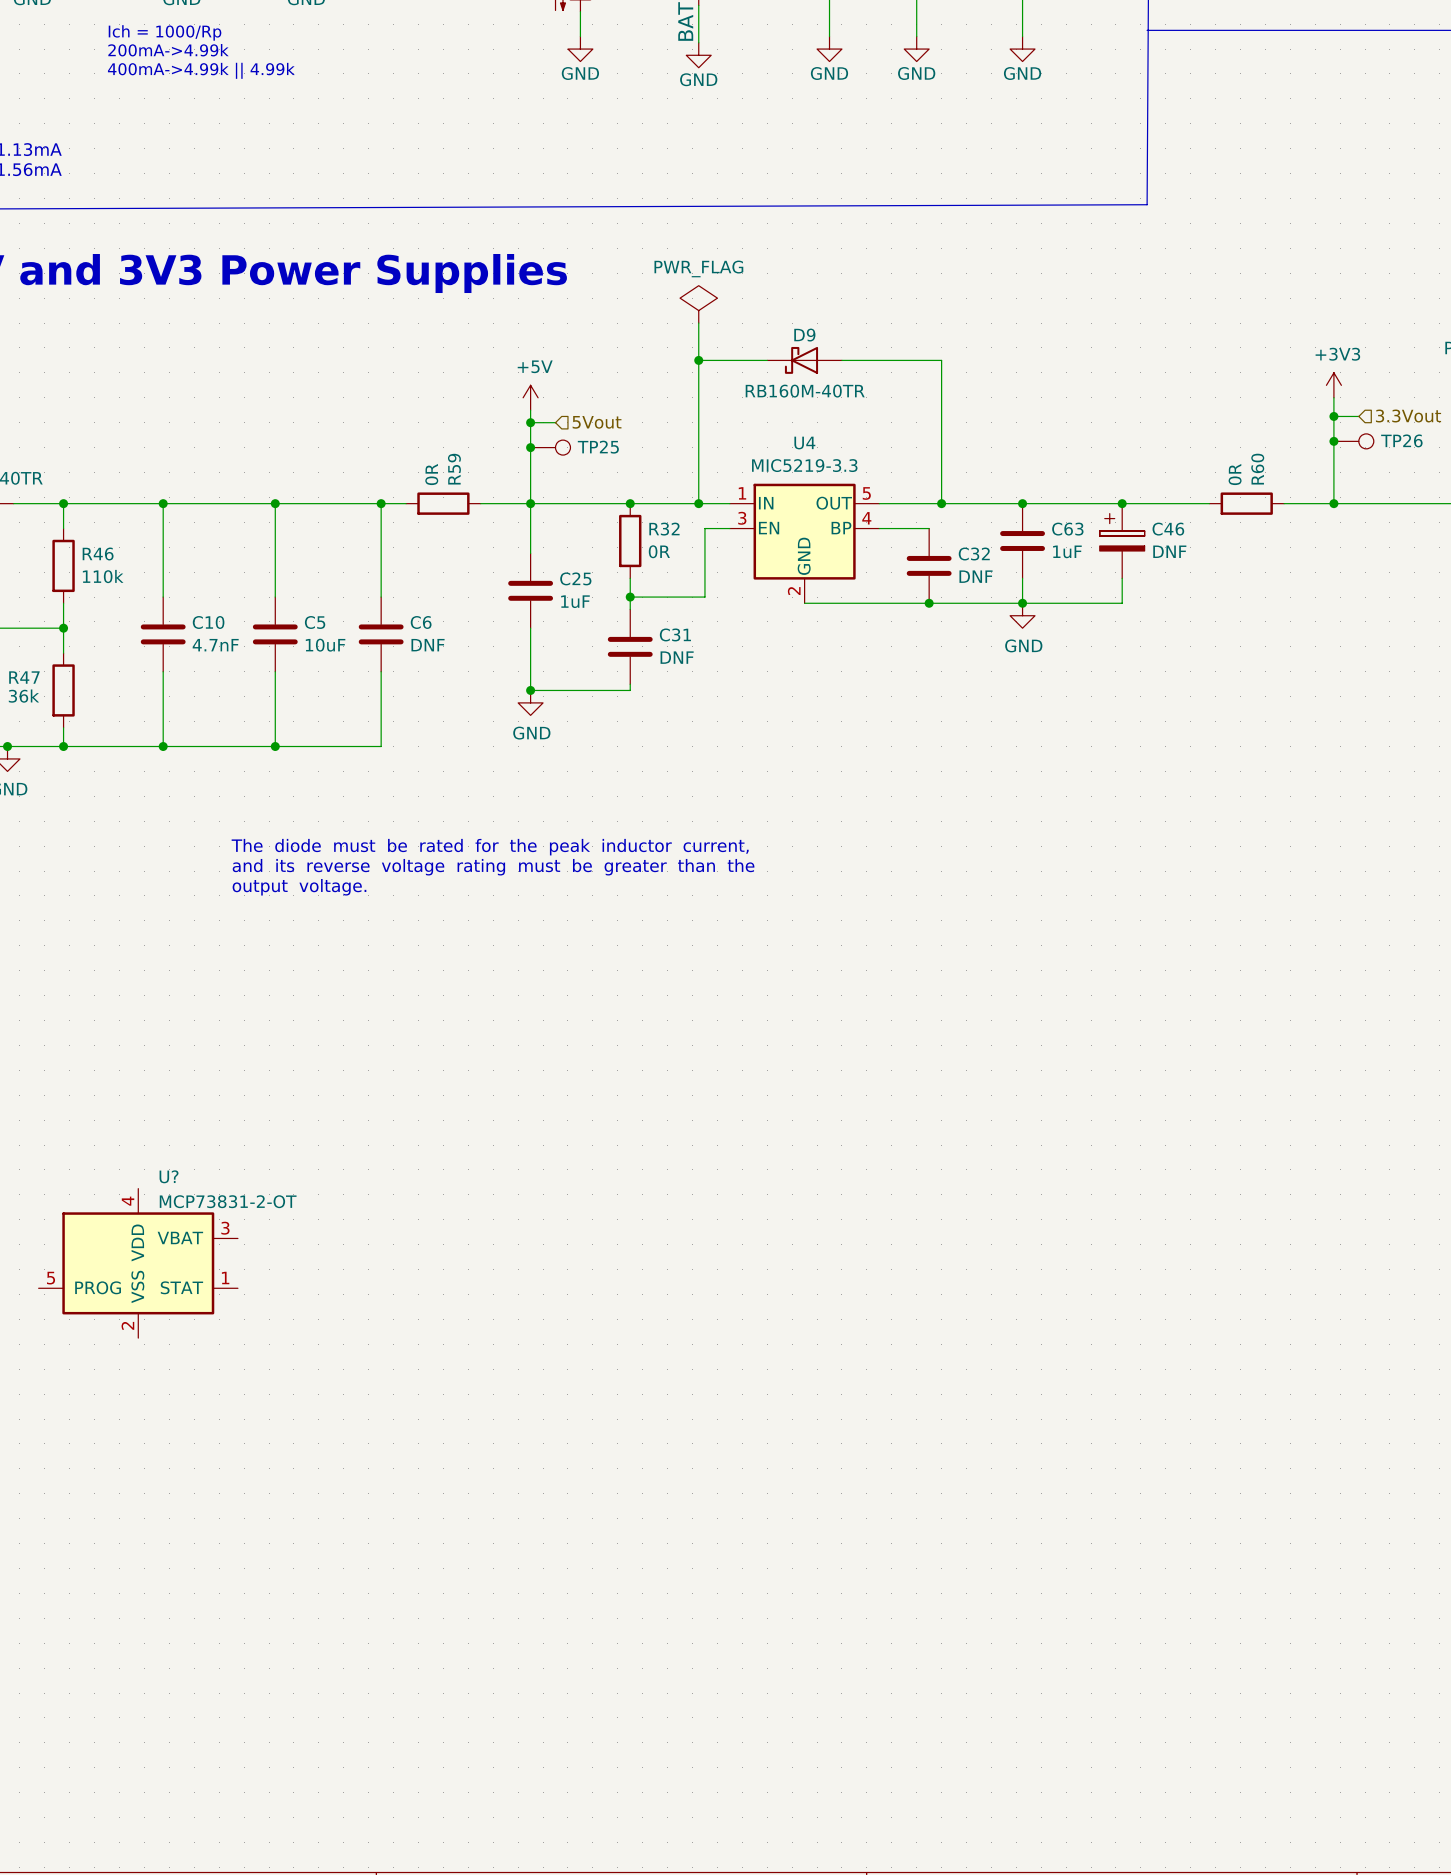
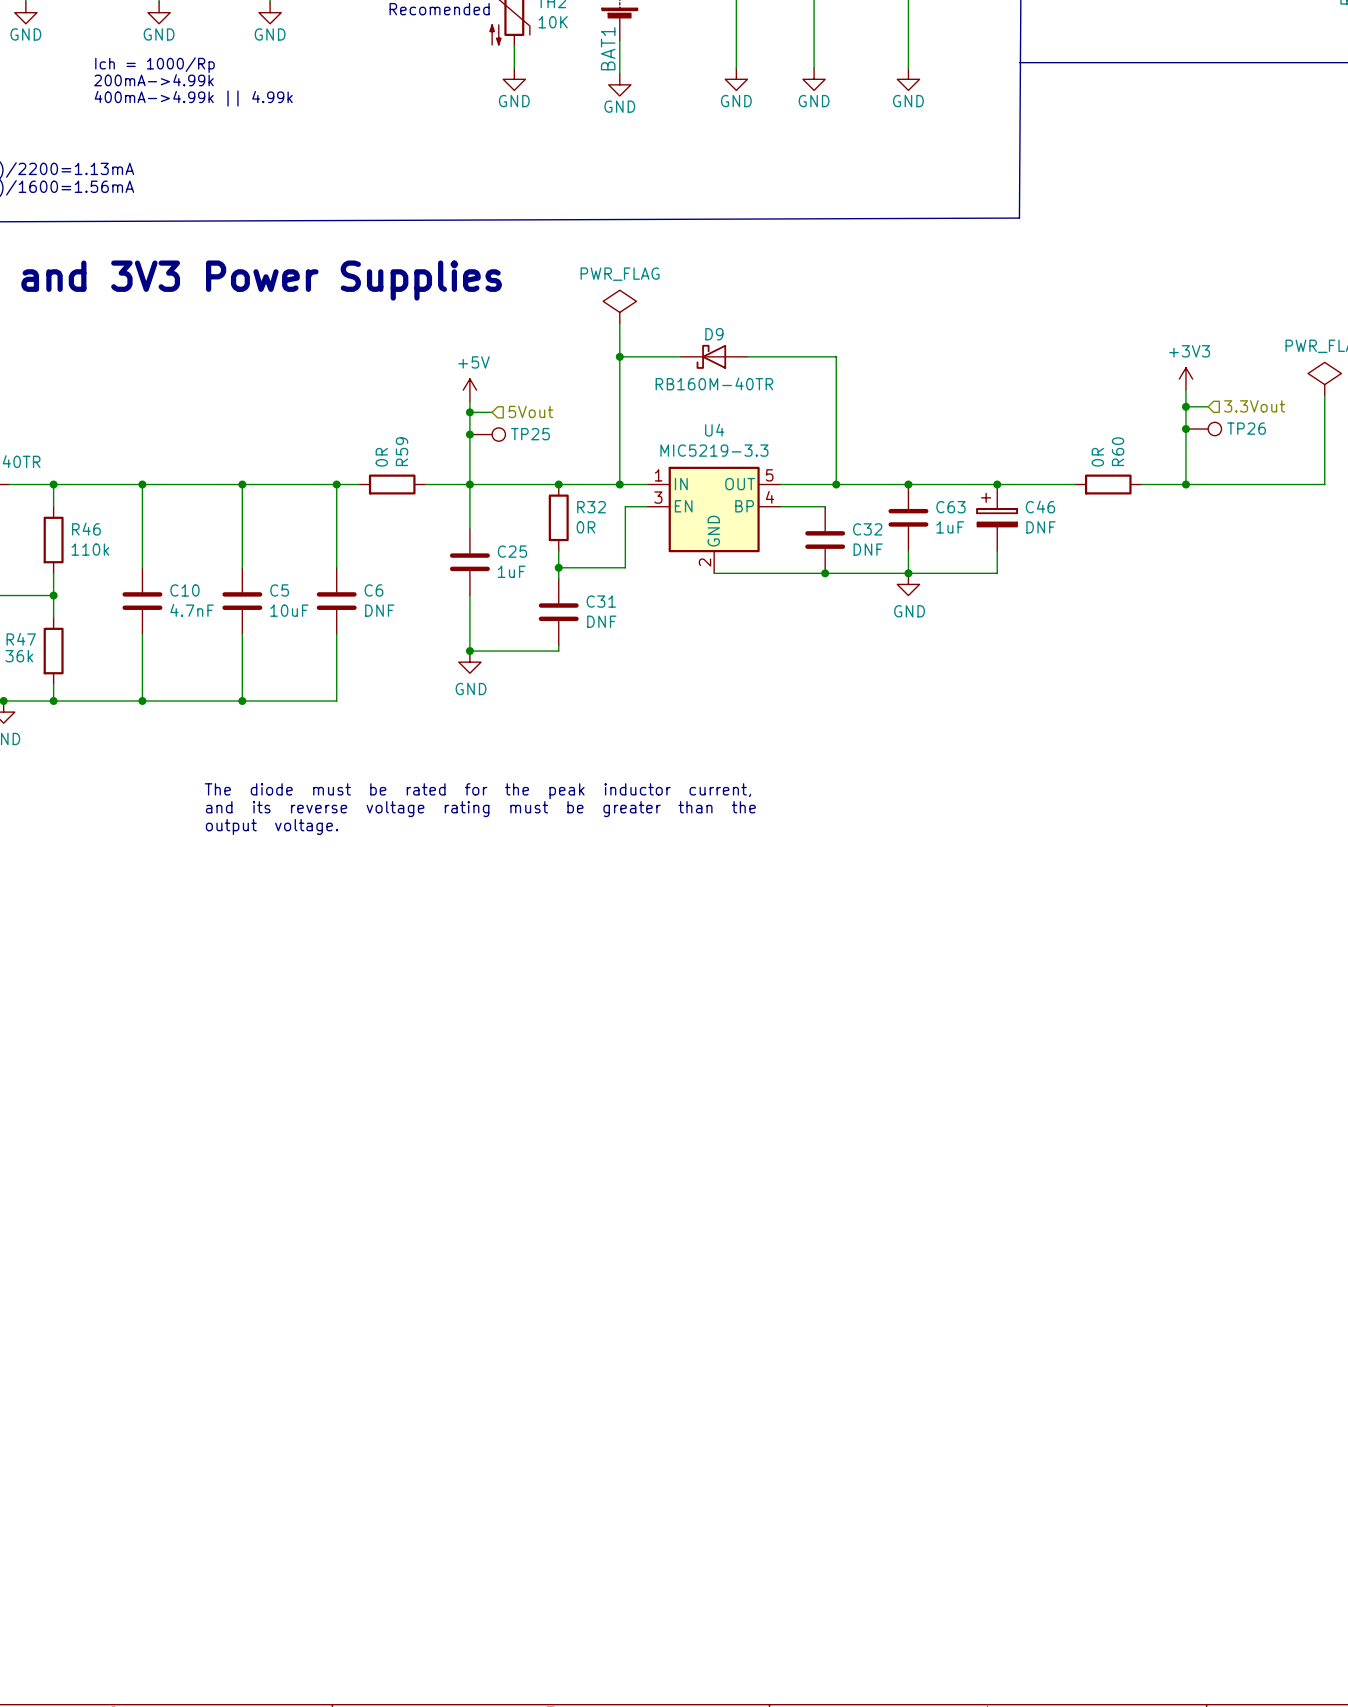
U?: MCP73831-2-OT (138, 1263) -> none

